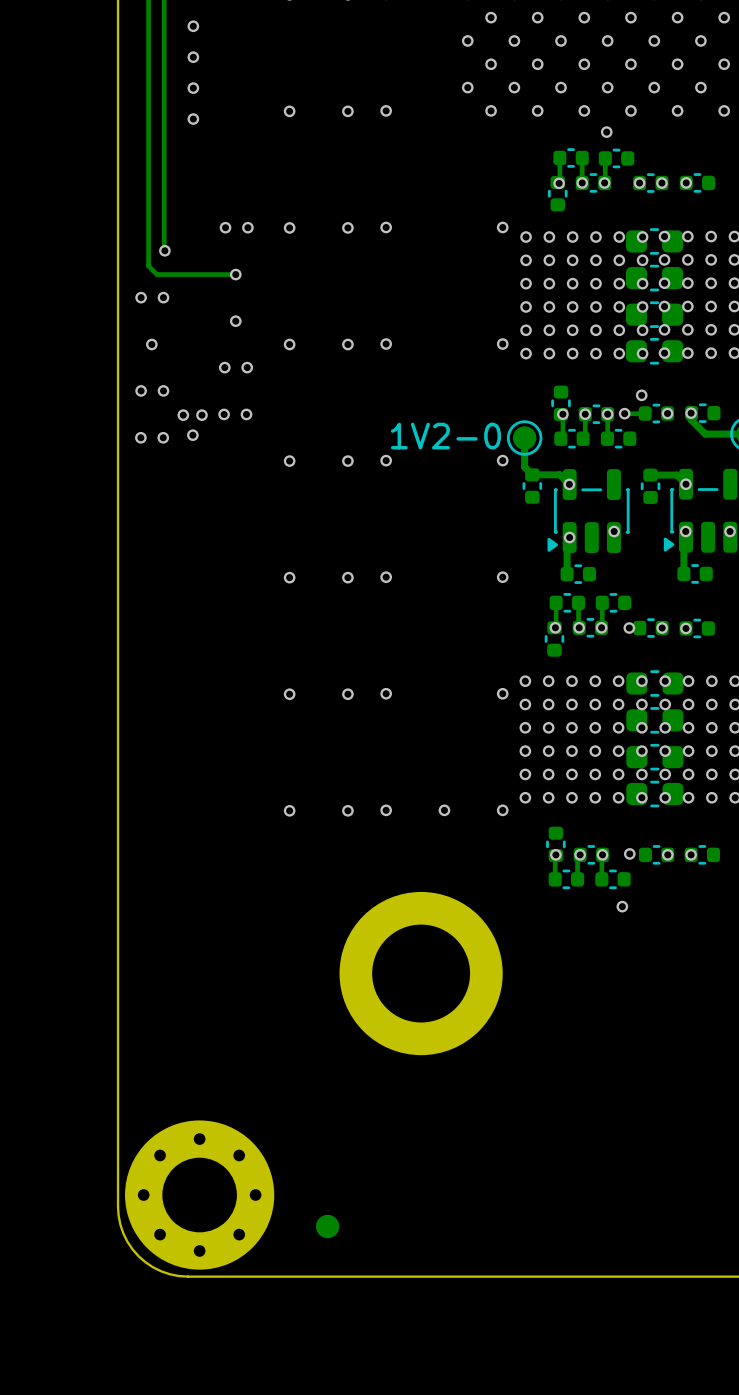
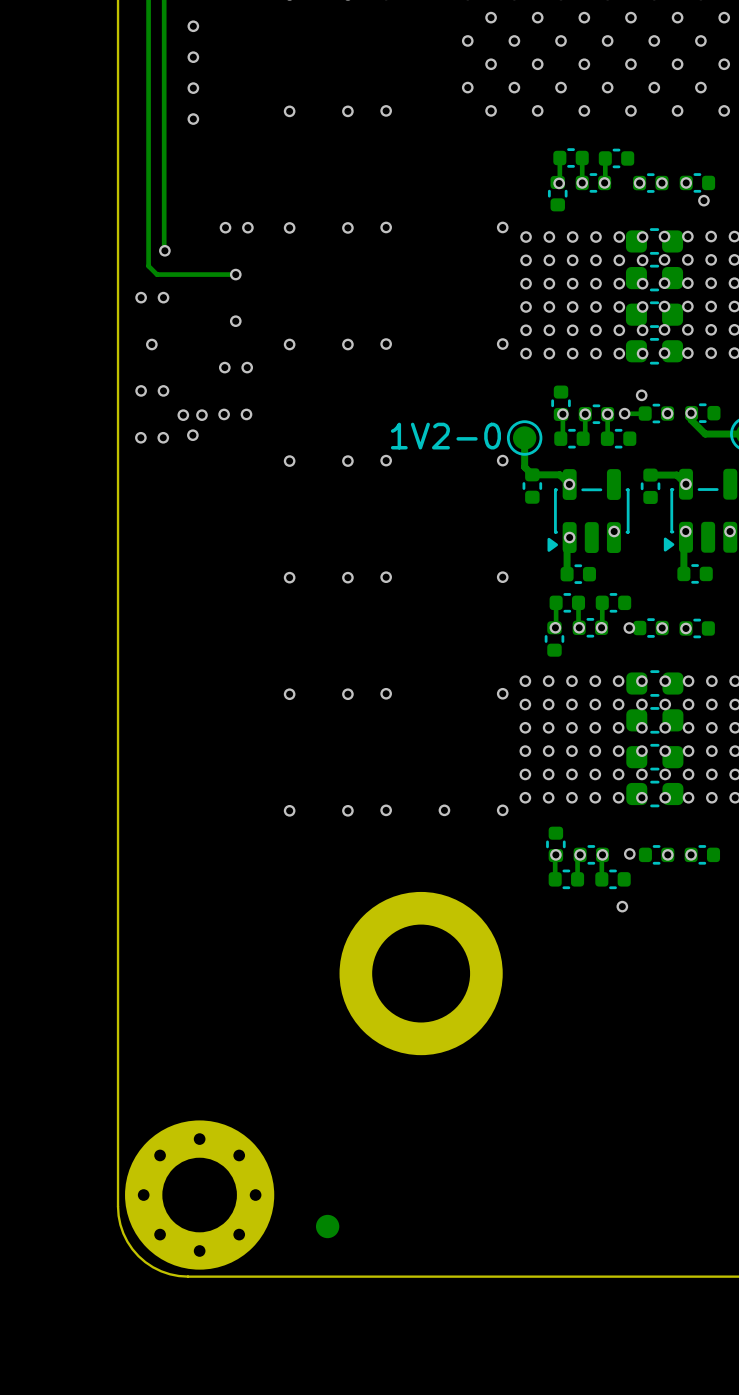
via position: (606, 132) -> (703, 200)

